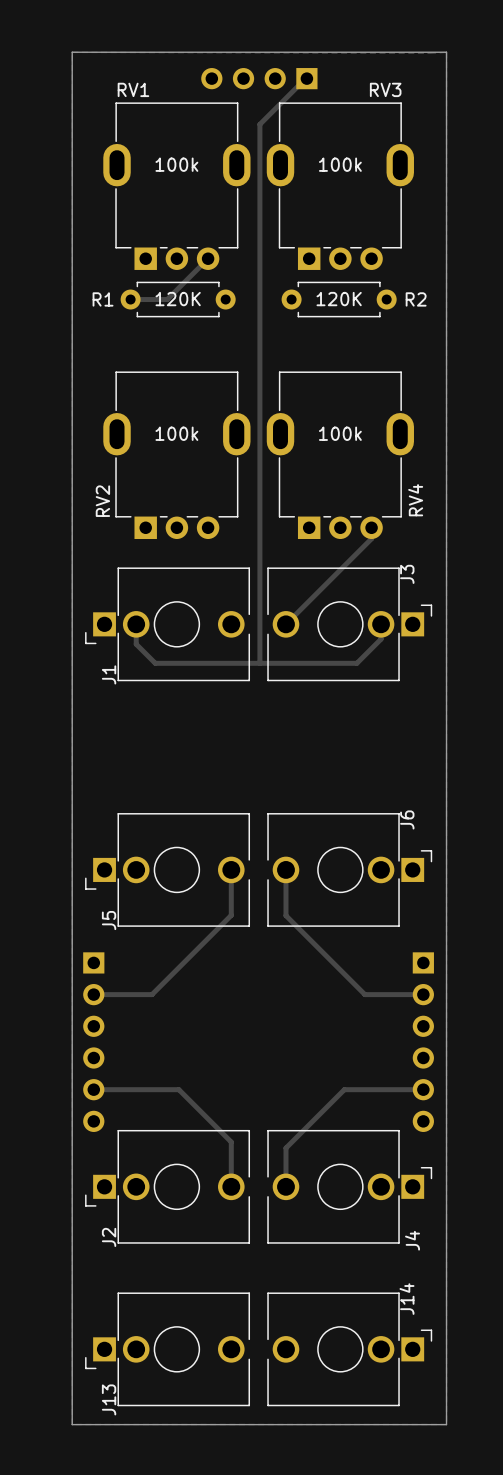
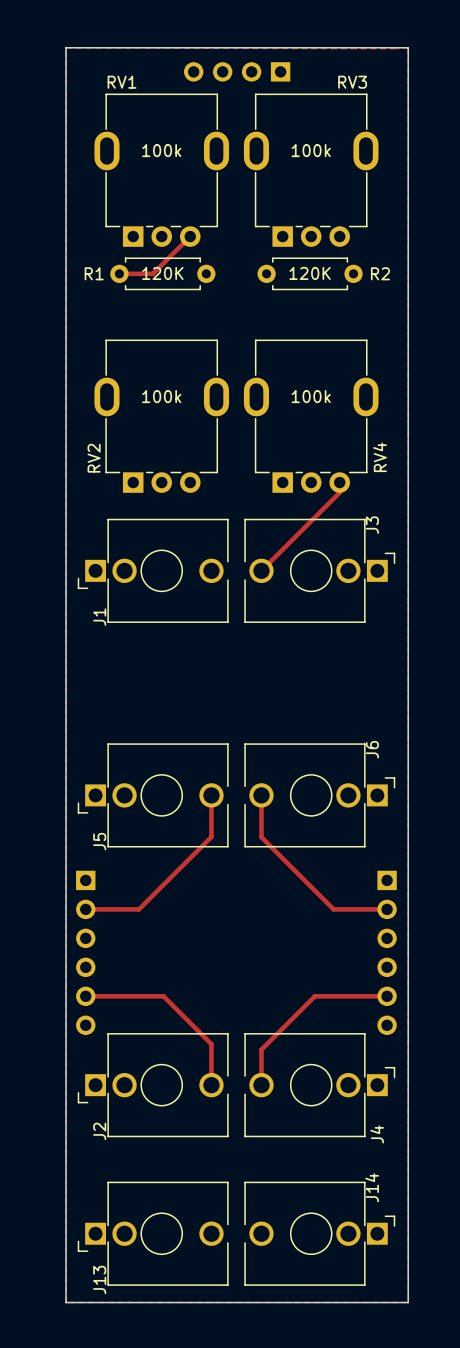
track: (306, 77) (259, 124) (259, 663) -> none
track: (136, 624) (136, 644) (155, 663) (356, 663) (381, 639) (381, 624) -> none

